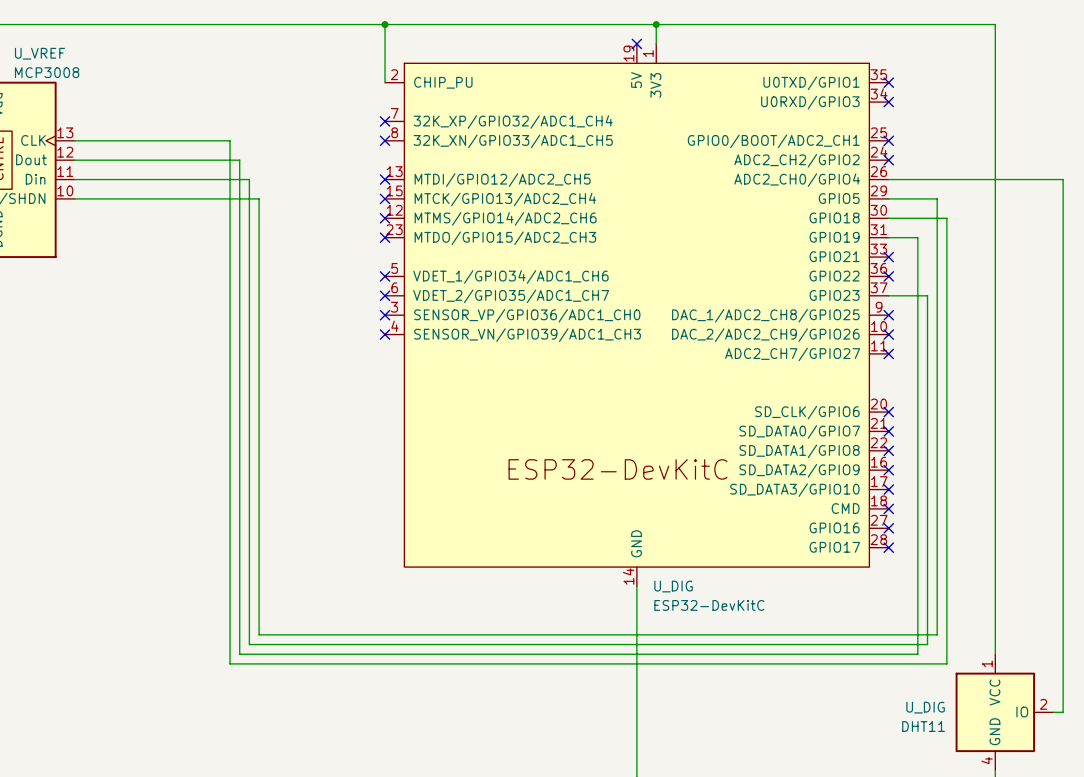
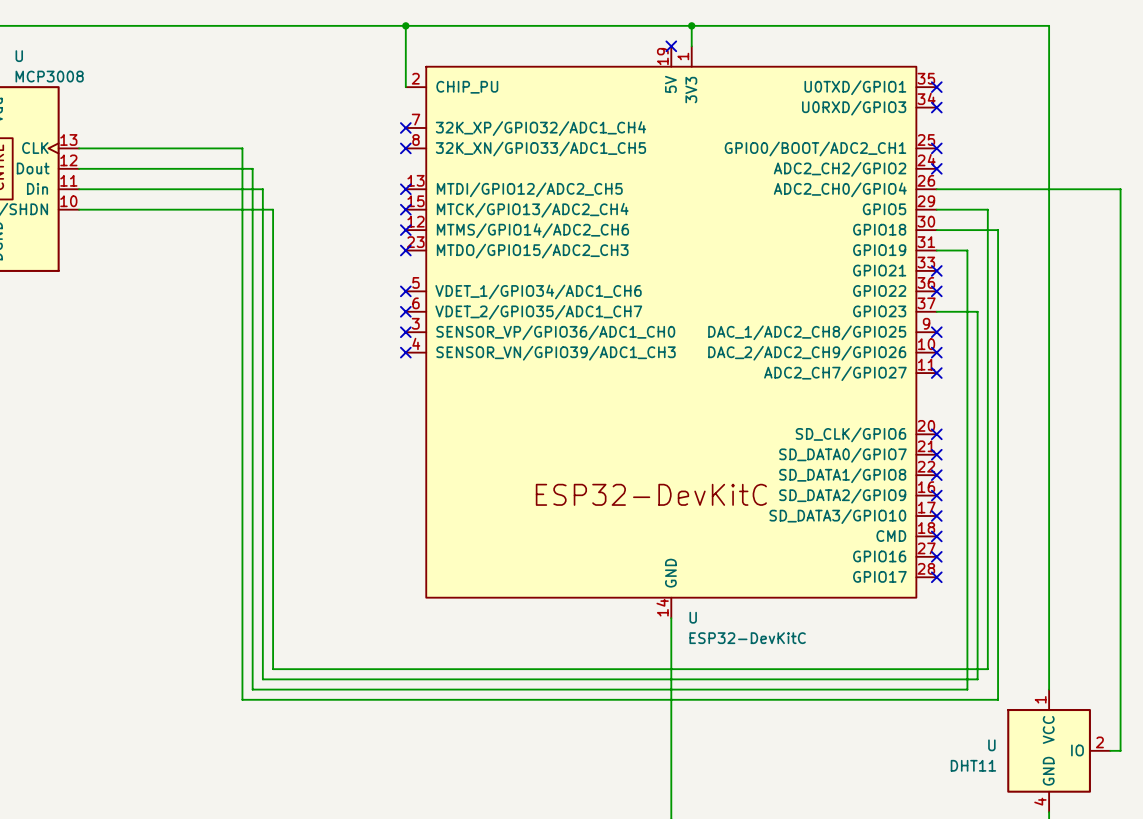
U_VREF name: U_VREF (39, 53) -> U (19, 56)
U_DIG name: U_DIG (673, 586) -> U (693, 617)
U_DIG name: U_DIG (925, 707) -> U (991, 745)

